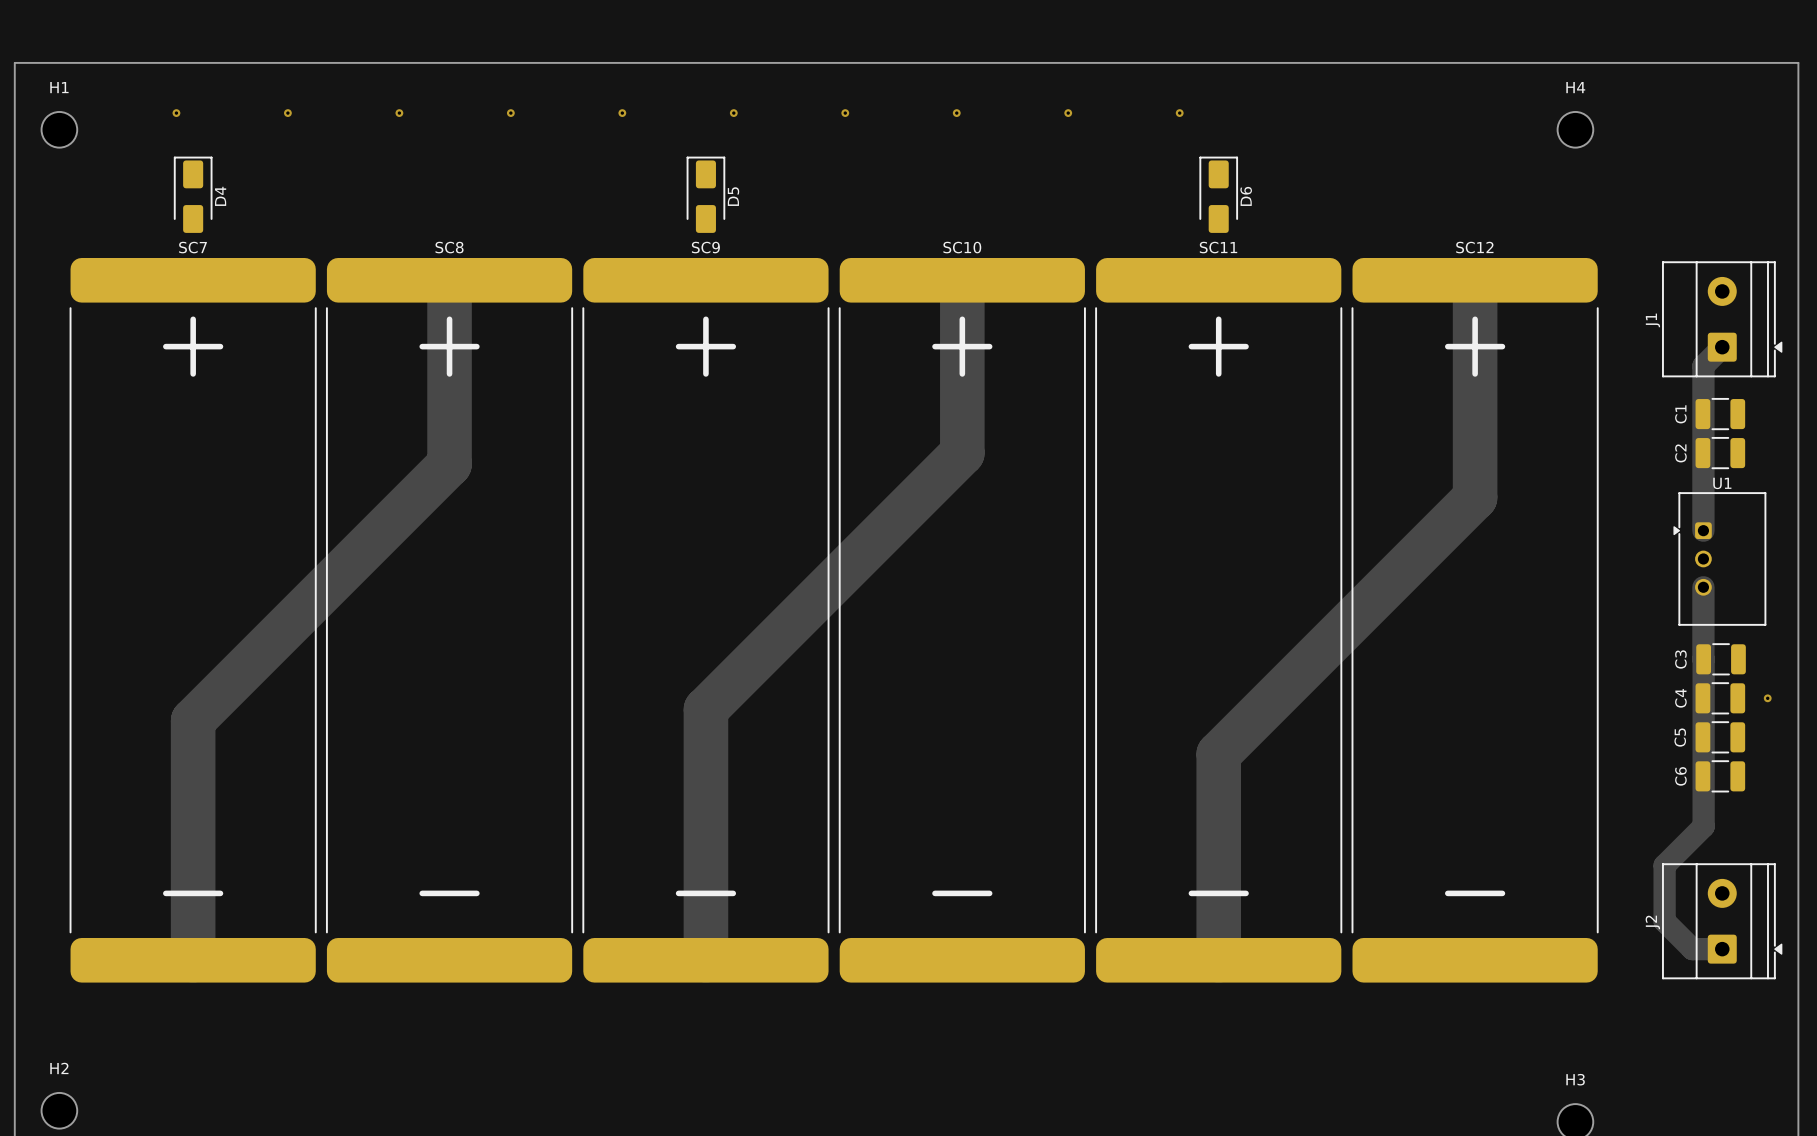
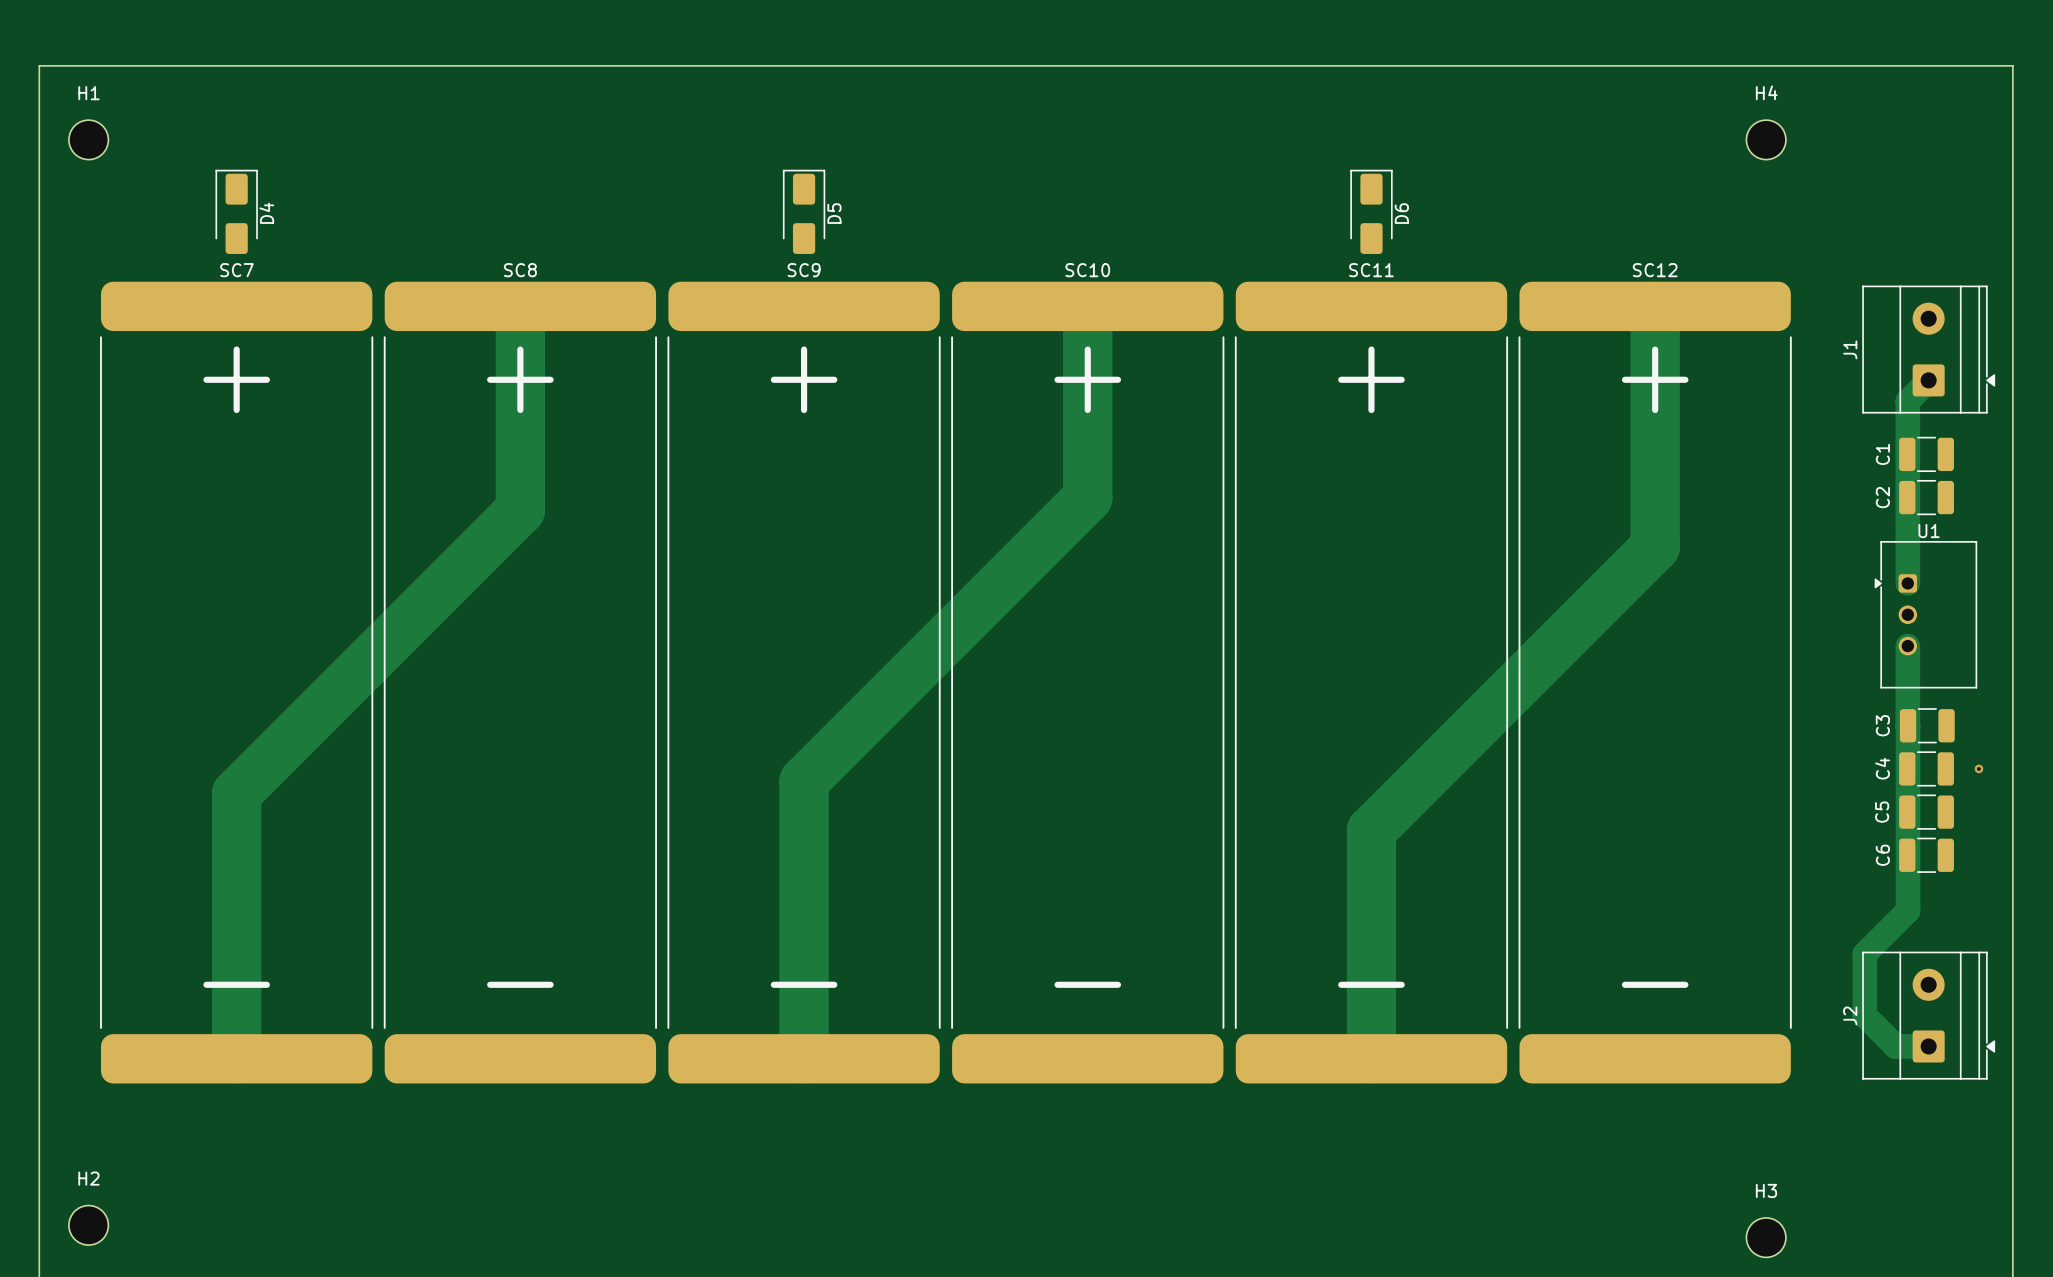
via: (176, 113) -> none
via: (287, 113) -> none
via: (399, 113) -> none
via: (510, 113) -> none
via: (622, 113) -> none
via: (733, 113) -> none
via: (845, 113) -> none
via: (956, 113) -> none
via: (1068, 113) -> none
via: (1179, 113) -> none

